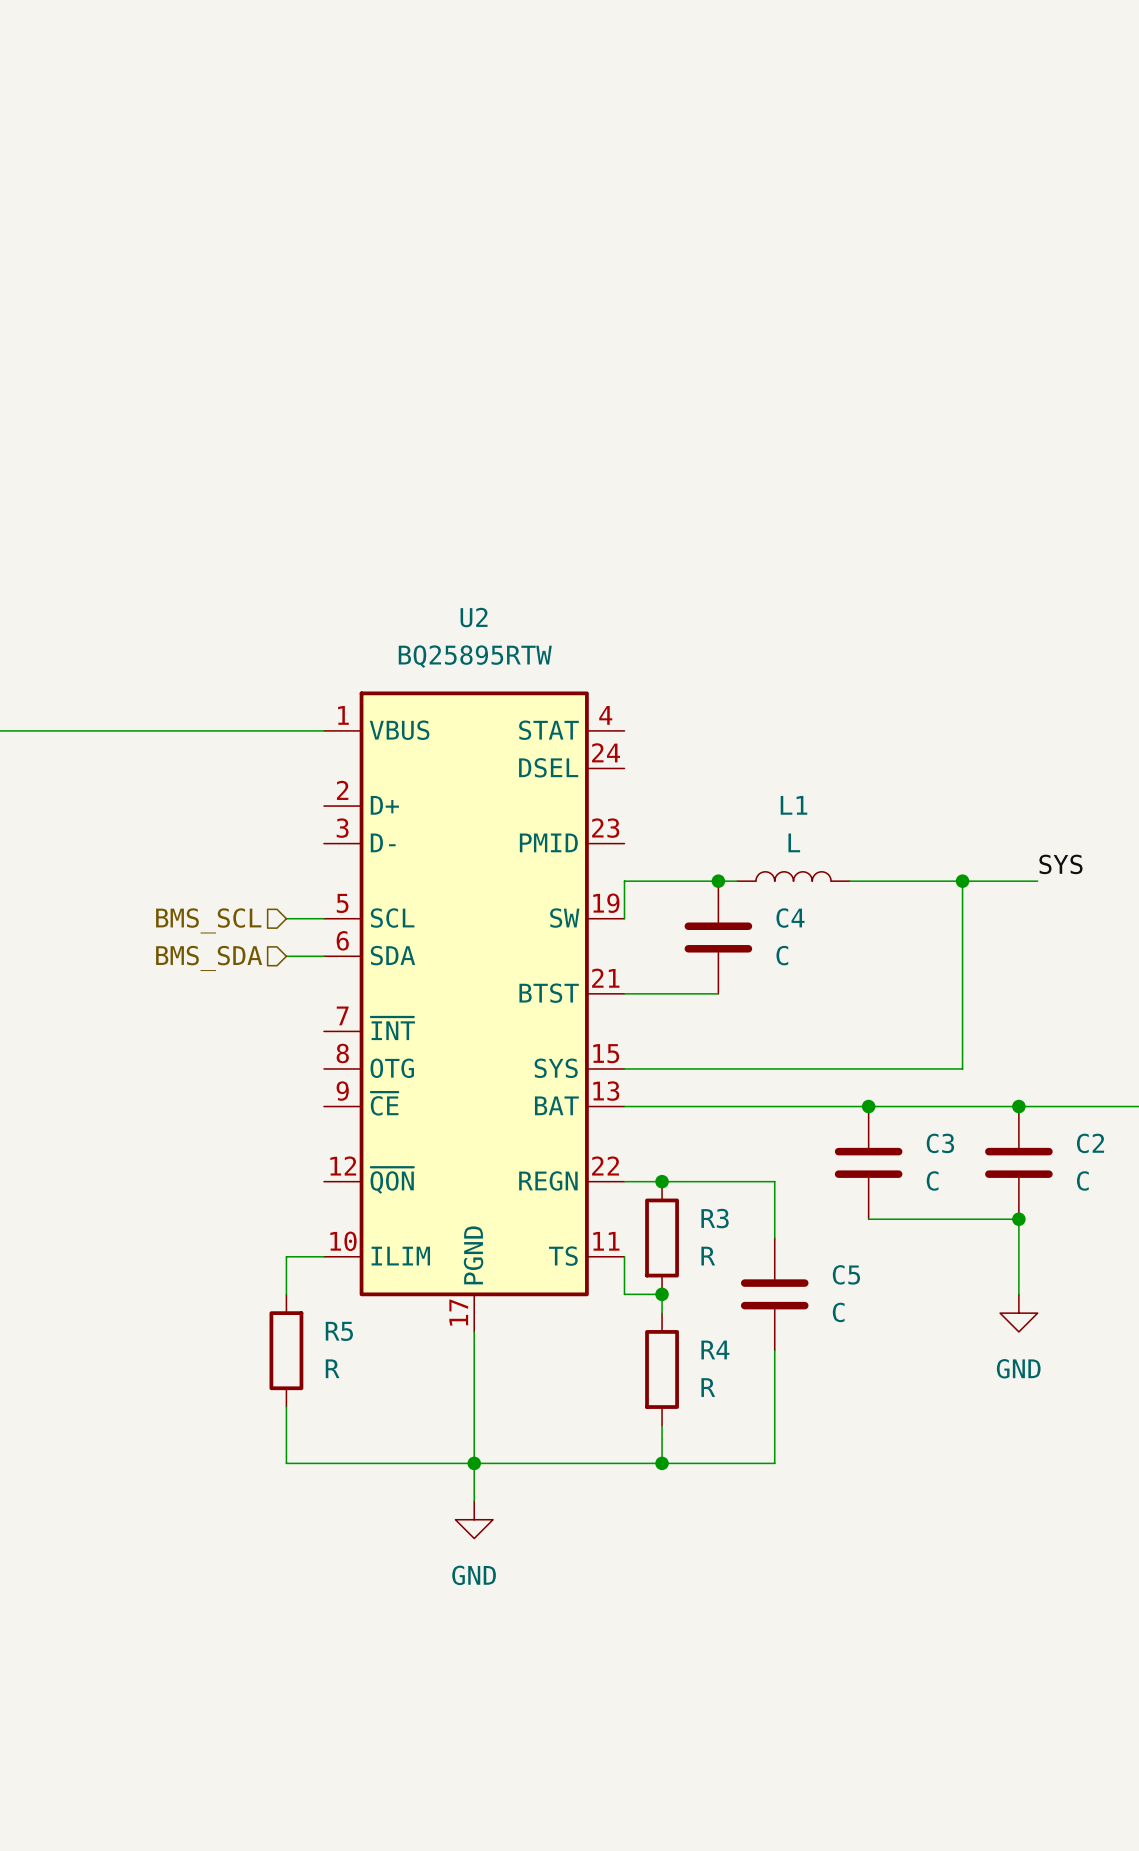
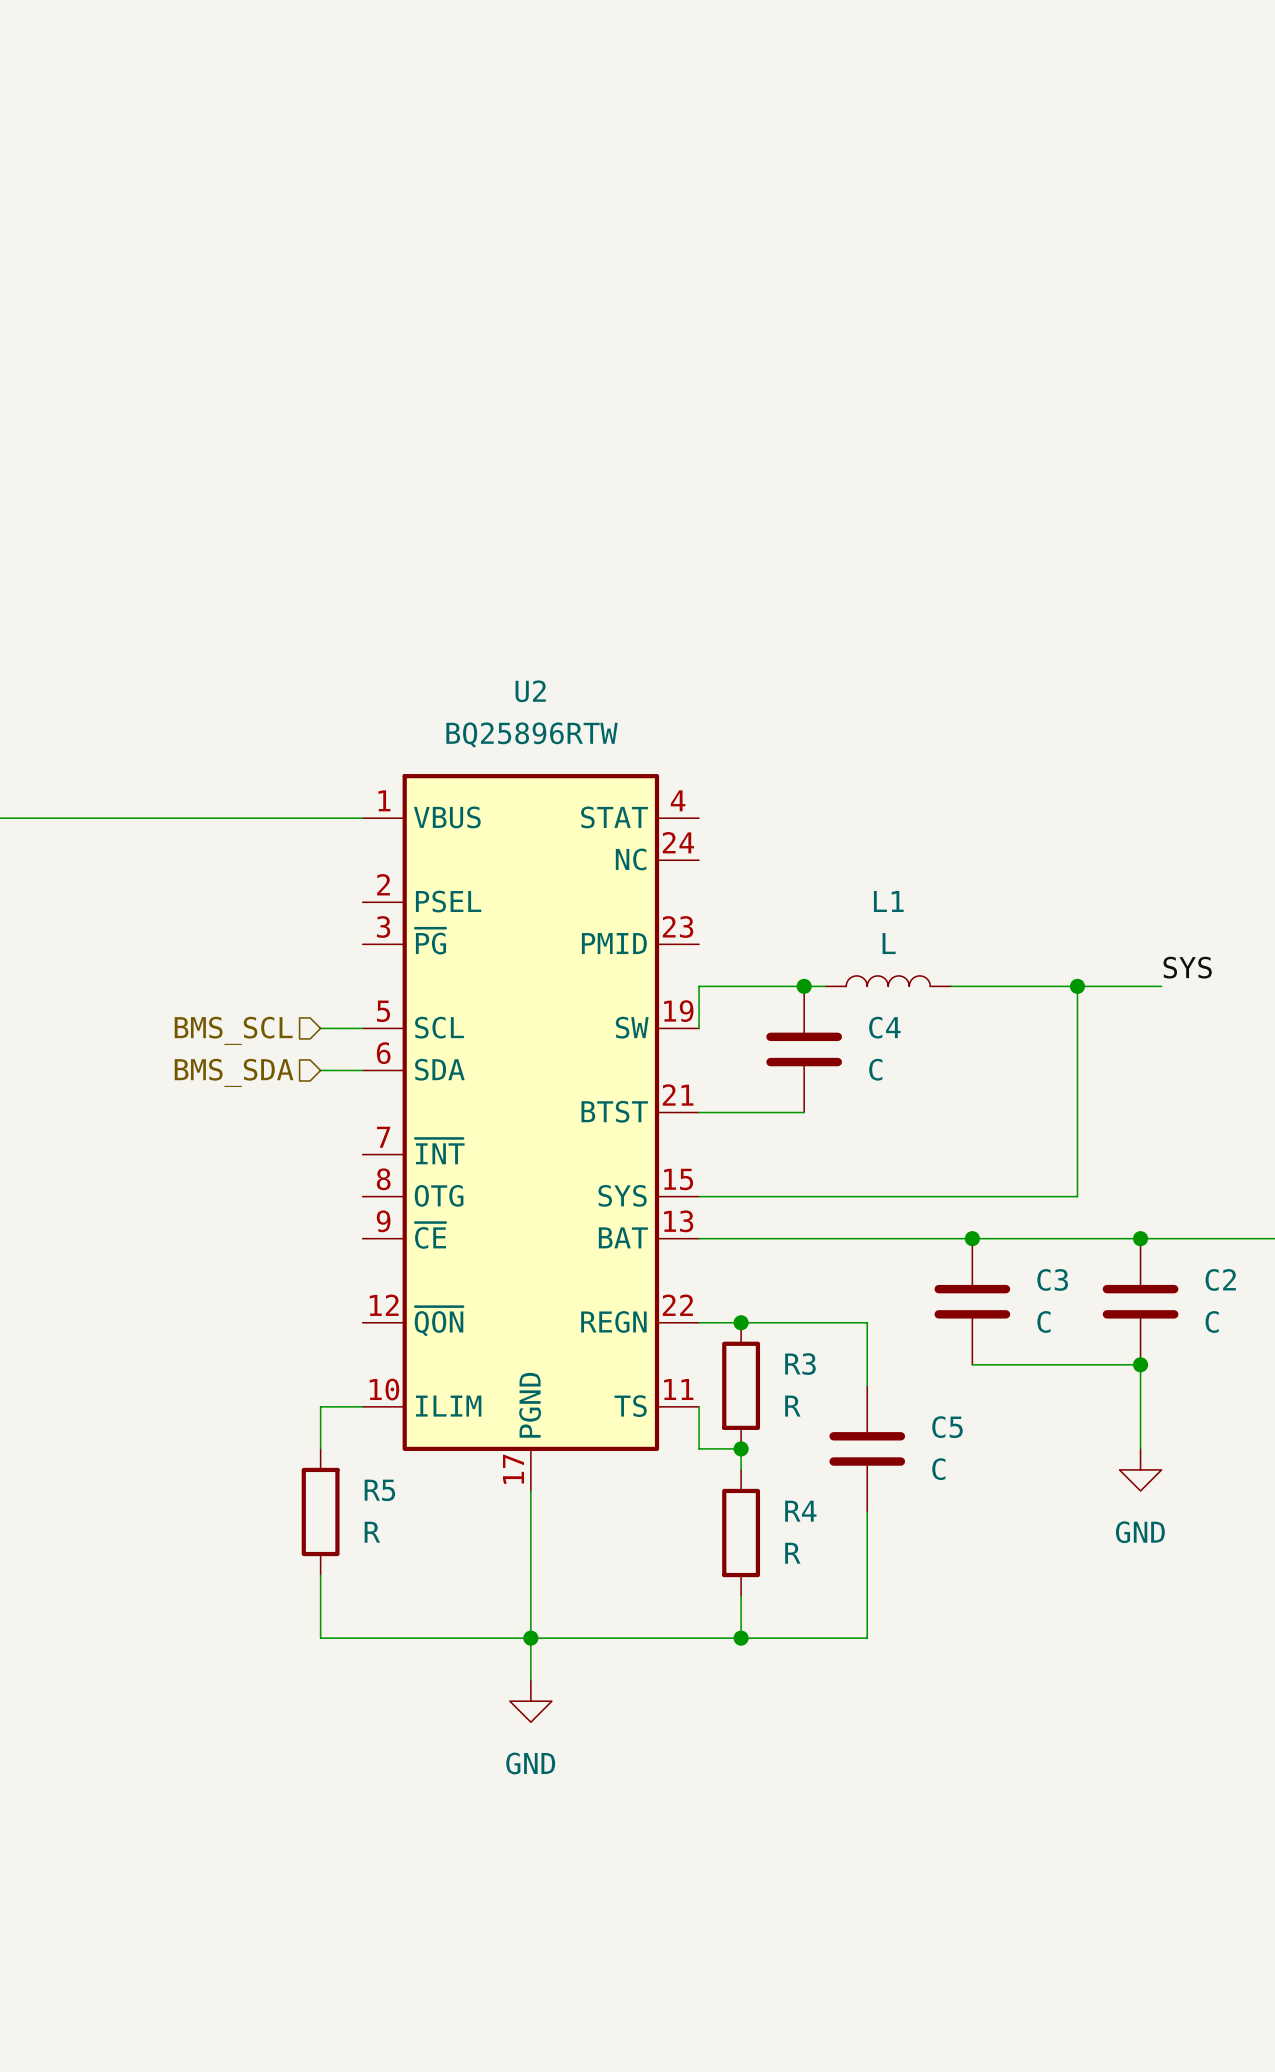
U2 value: BQ25895RTW (475, 656) -> BQ25896RTW (532, 735)
U2 pin name: DSEL (548, 767) -> NC (631, 859)
U2 pin name: D+ (384, 805) -> PSEL (448, 901)
U2 pin name: D- (383, 842) -> ~{PG} (430, 941)

